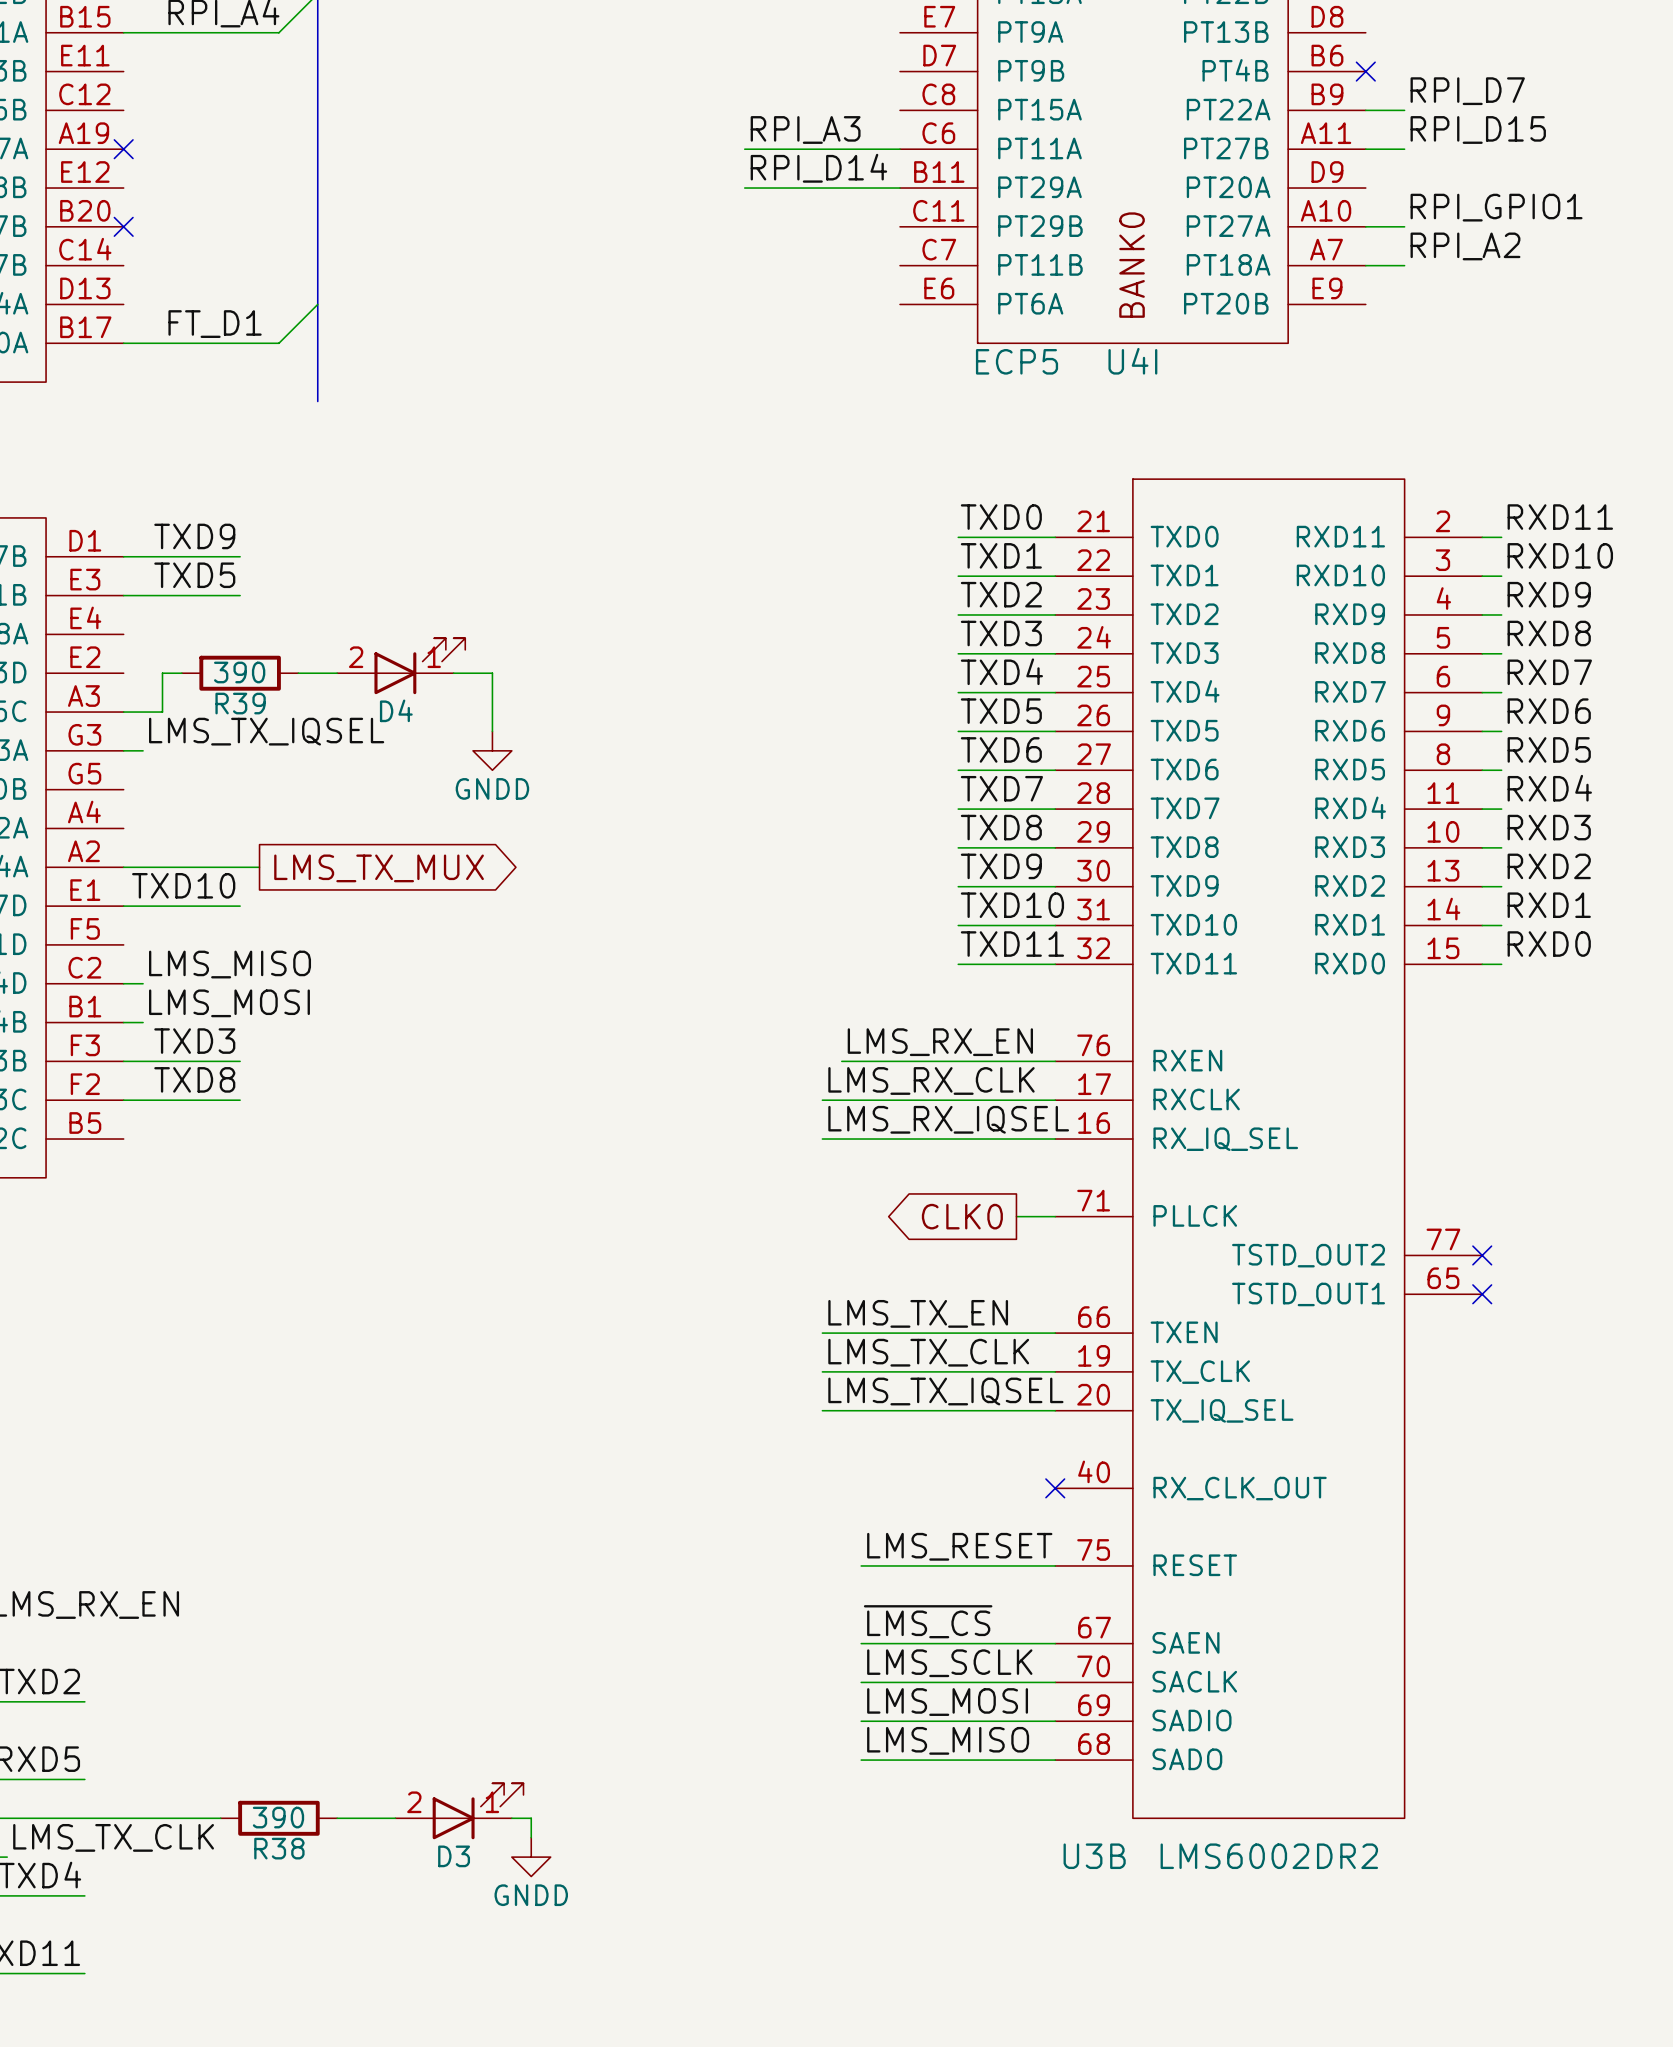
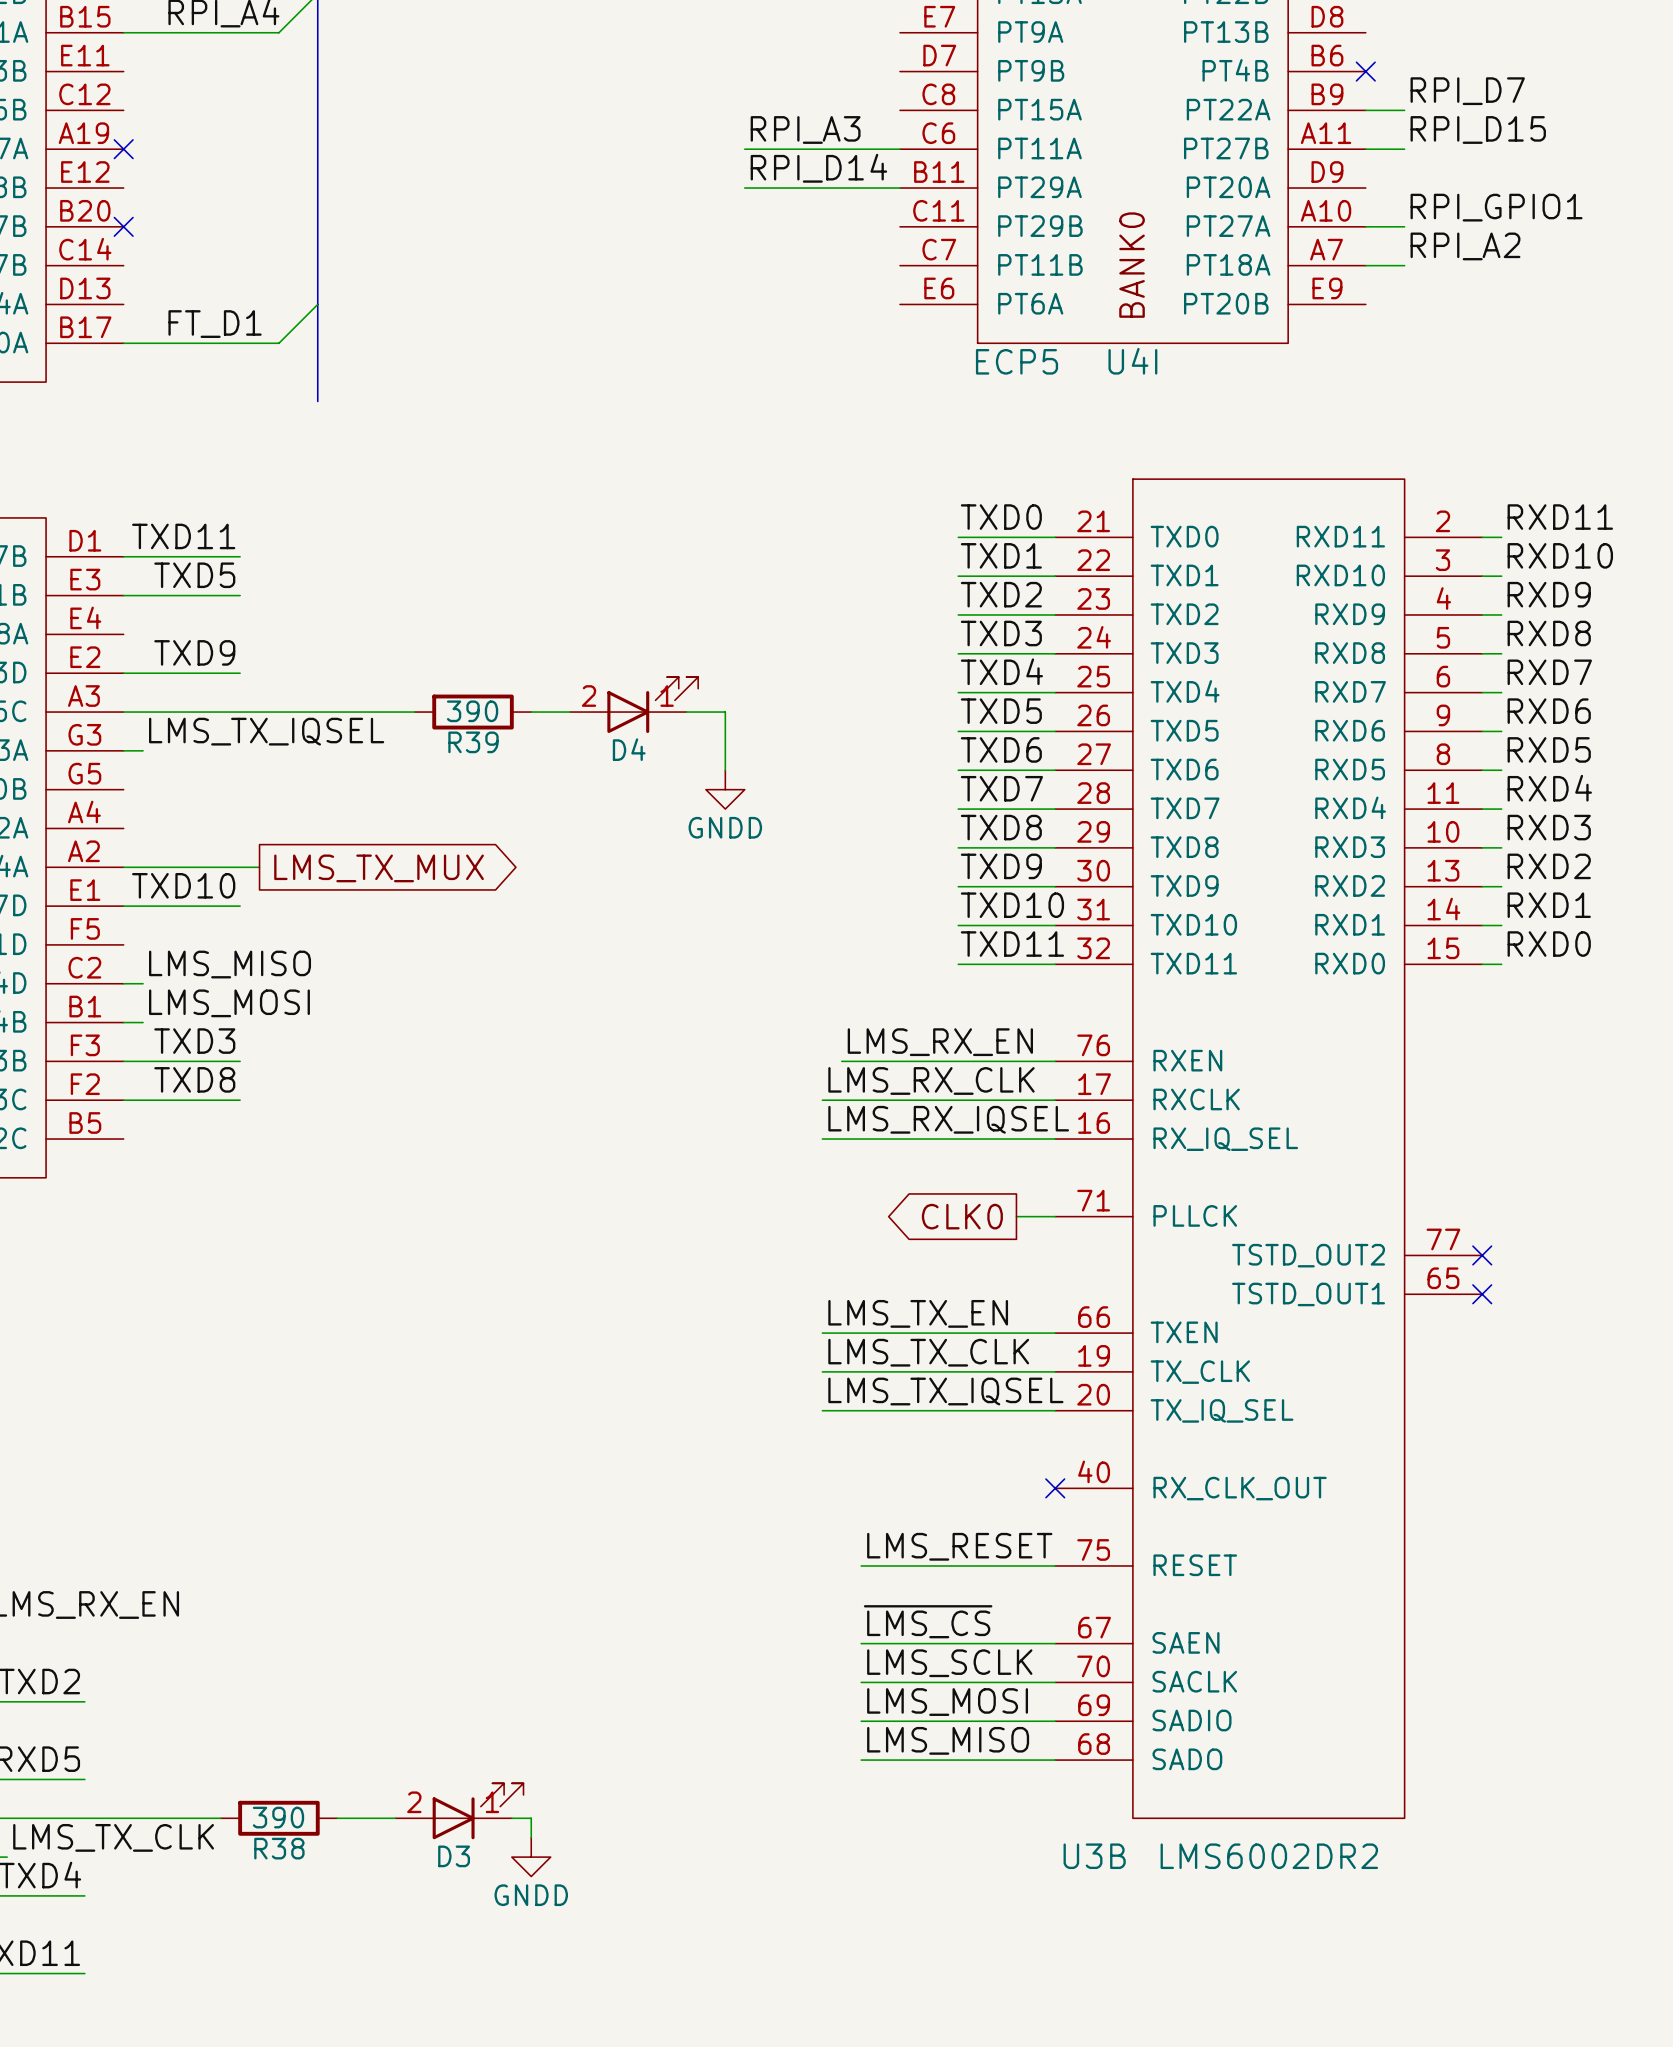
label: TXD9 (194, 536) -> TXD11 (183, 536)
label: none -> TXD9 (194, 652)
D4 position: (401, 666) -> (634, 705)
wire: (162, 673) (162, 712) -> (162, 673) (123, 673)
wire: none -> (181, 673) (240, 673)
R39 position: (240, 673) -> (473, 712)
wire: (298, 673) (337, 673) -> (531, 712) (570, 712)
wire: (453, 673) (492, 673) (492, 731) -> (686, 712) (725, 712) (725, 770)
wire: none -> (162, 712) (414, 712)
power symbol position: GNDD (492, 750) -> GNDD (725, 789)

